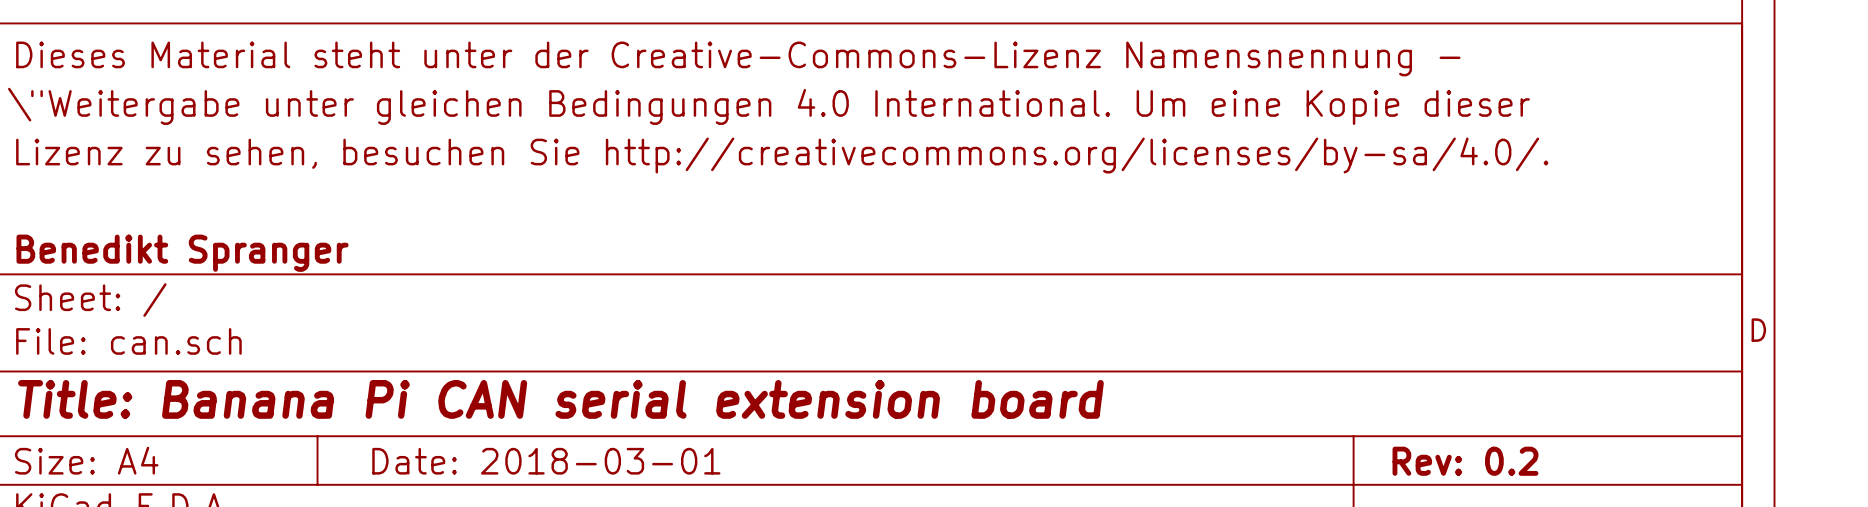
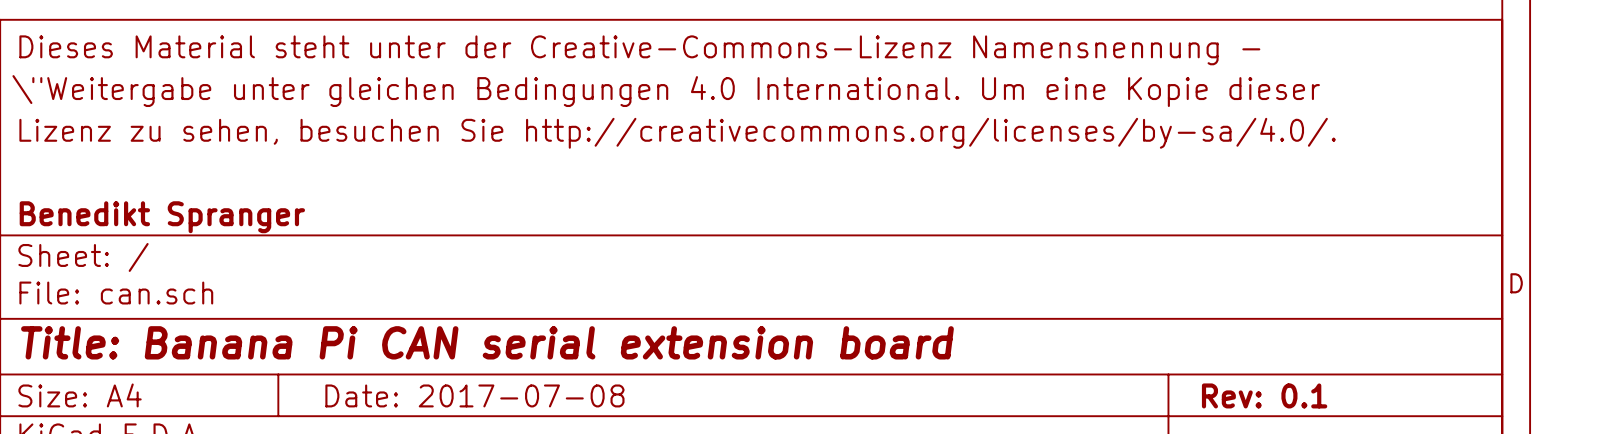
title block: Date: 2018-03-01 (546, 461) -> Date: 2017-07-08 (474, 395)
title block: Rev: 0.2 (1465, 461) -> Rev: 0.1 (1264, 395)

